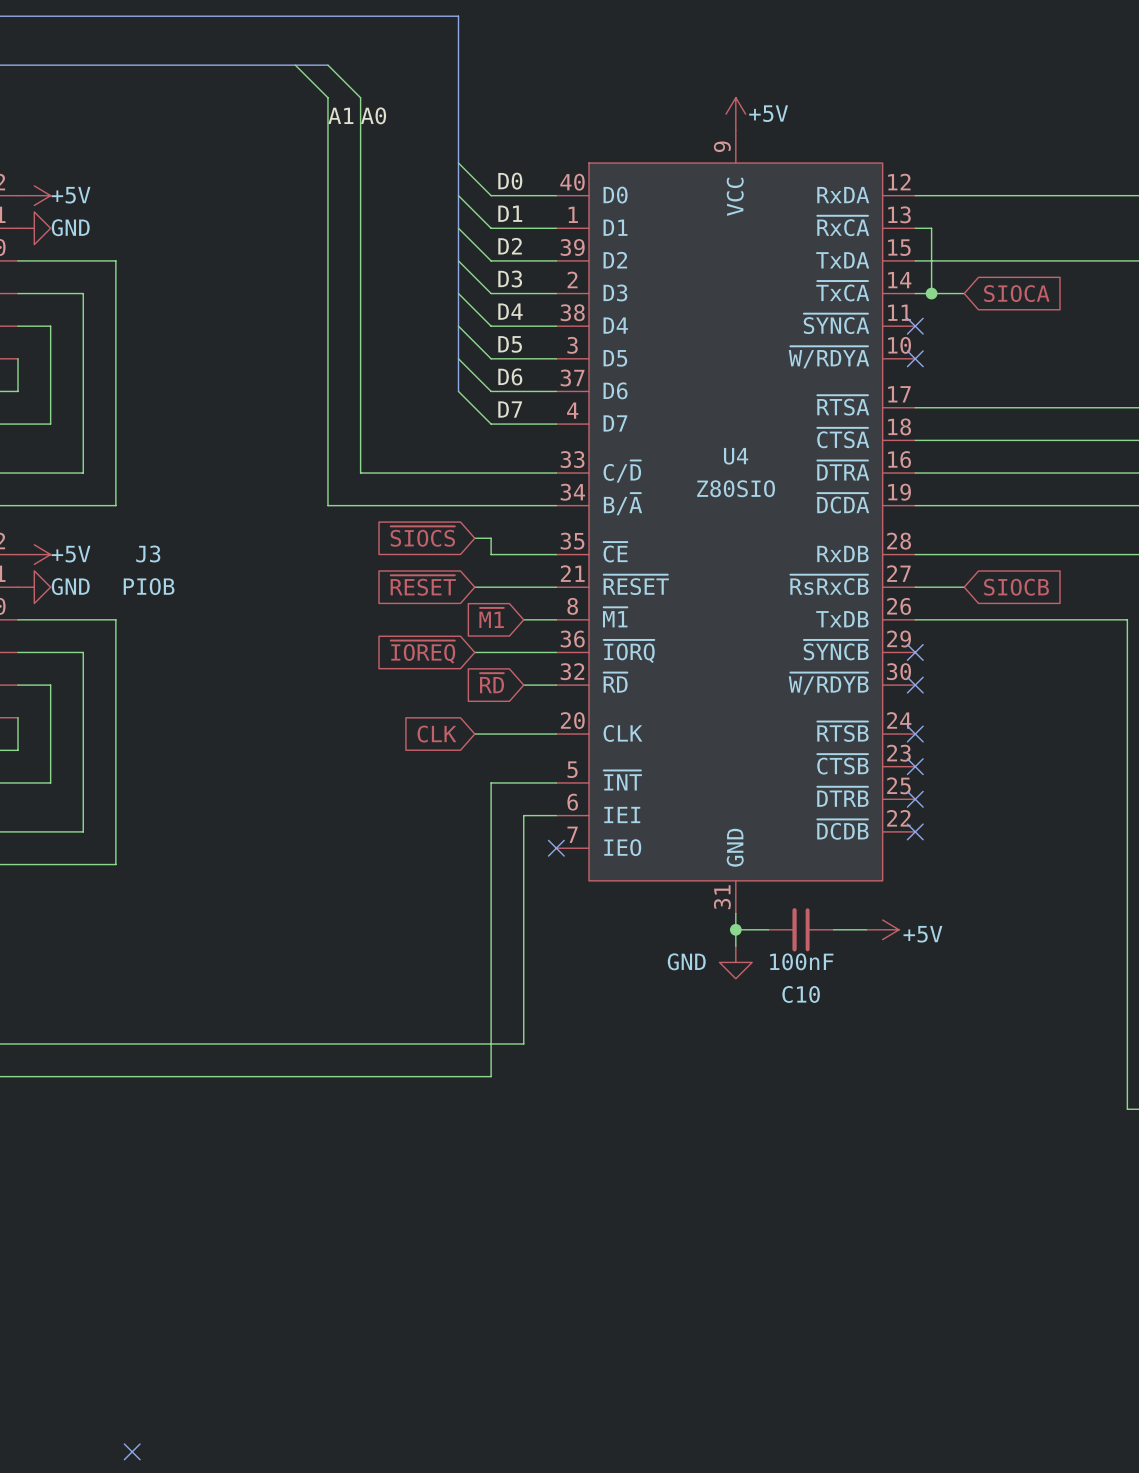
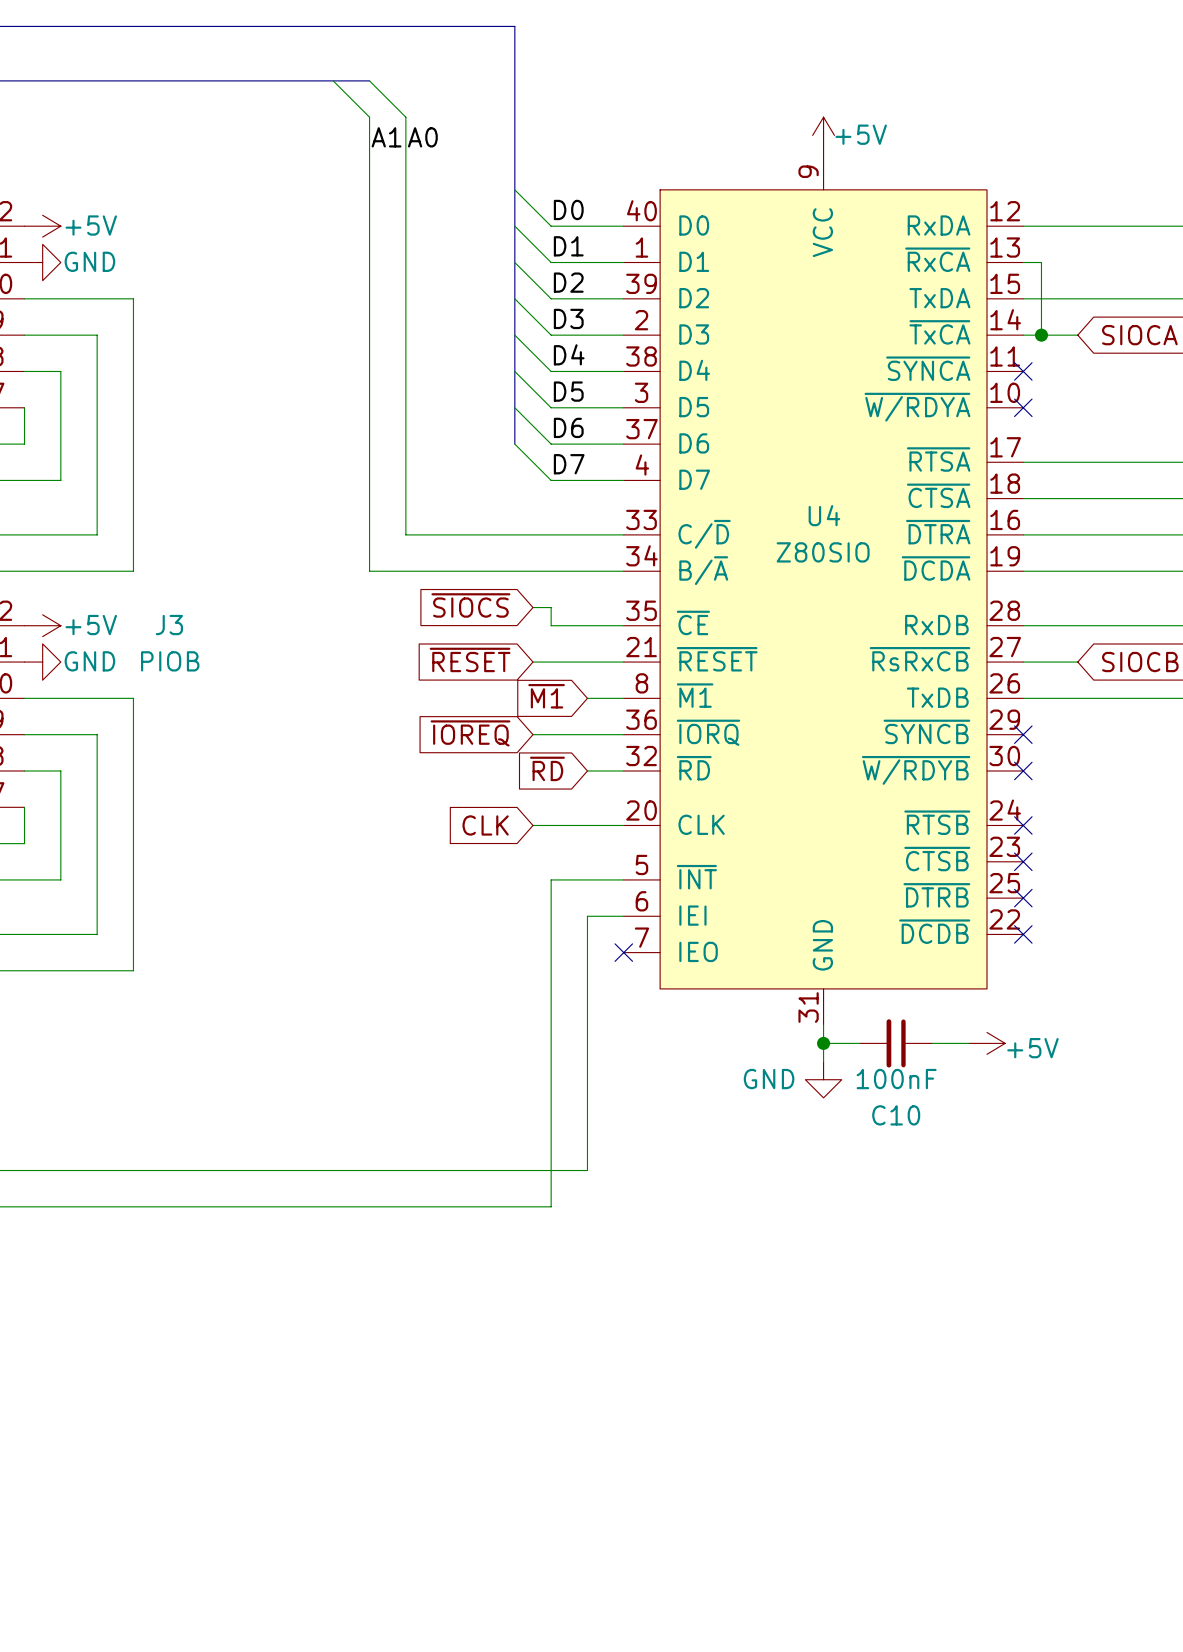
no-connect mark: (132, 1451) -> none

